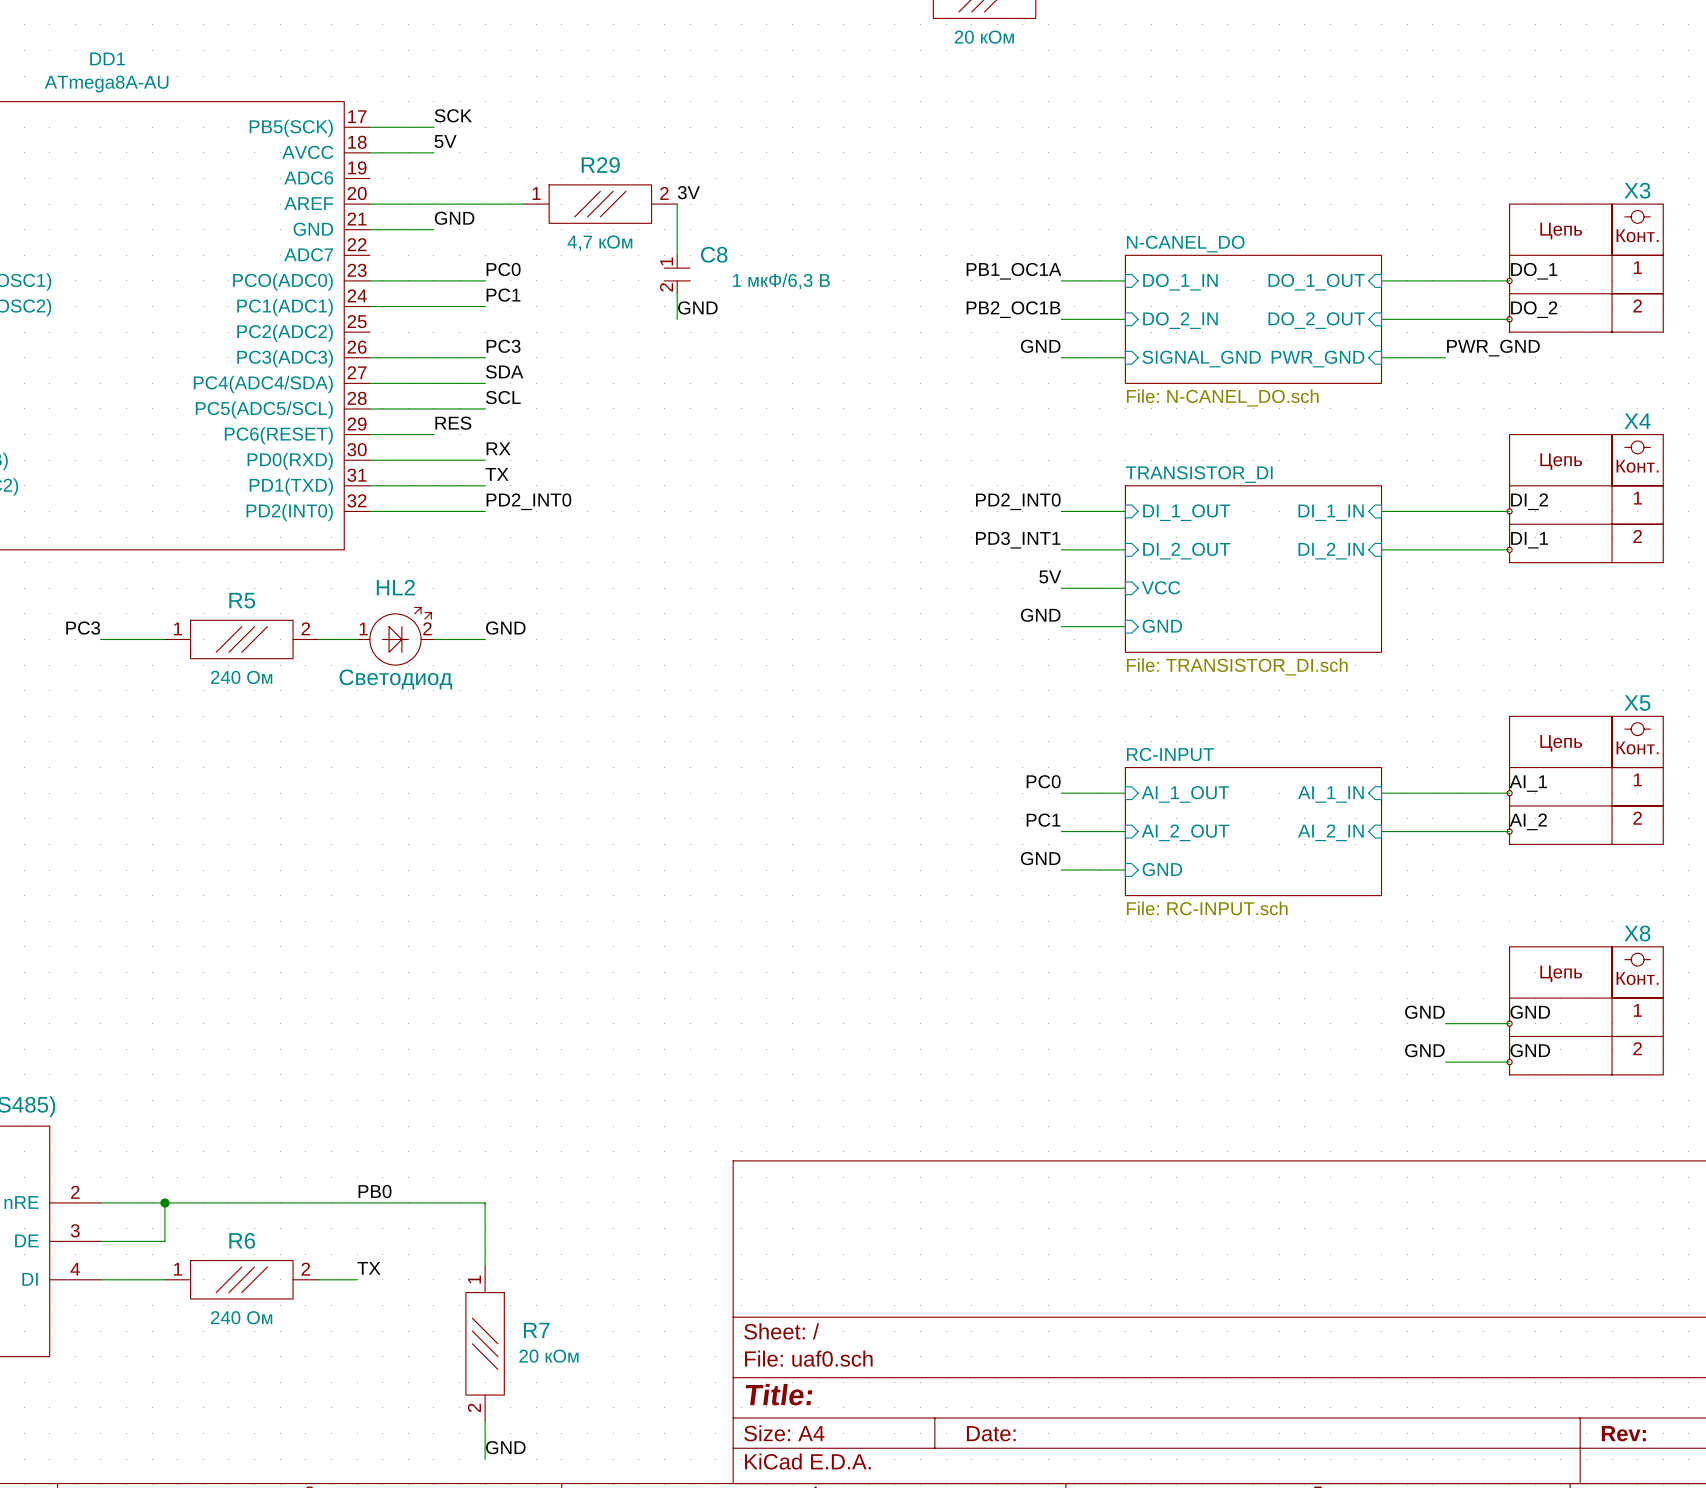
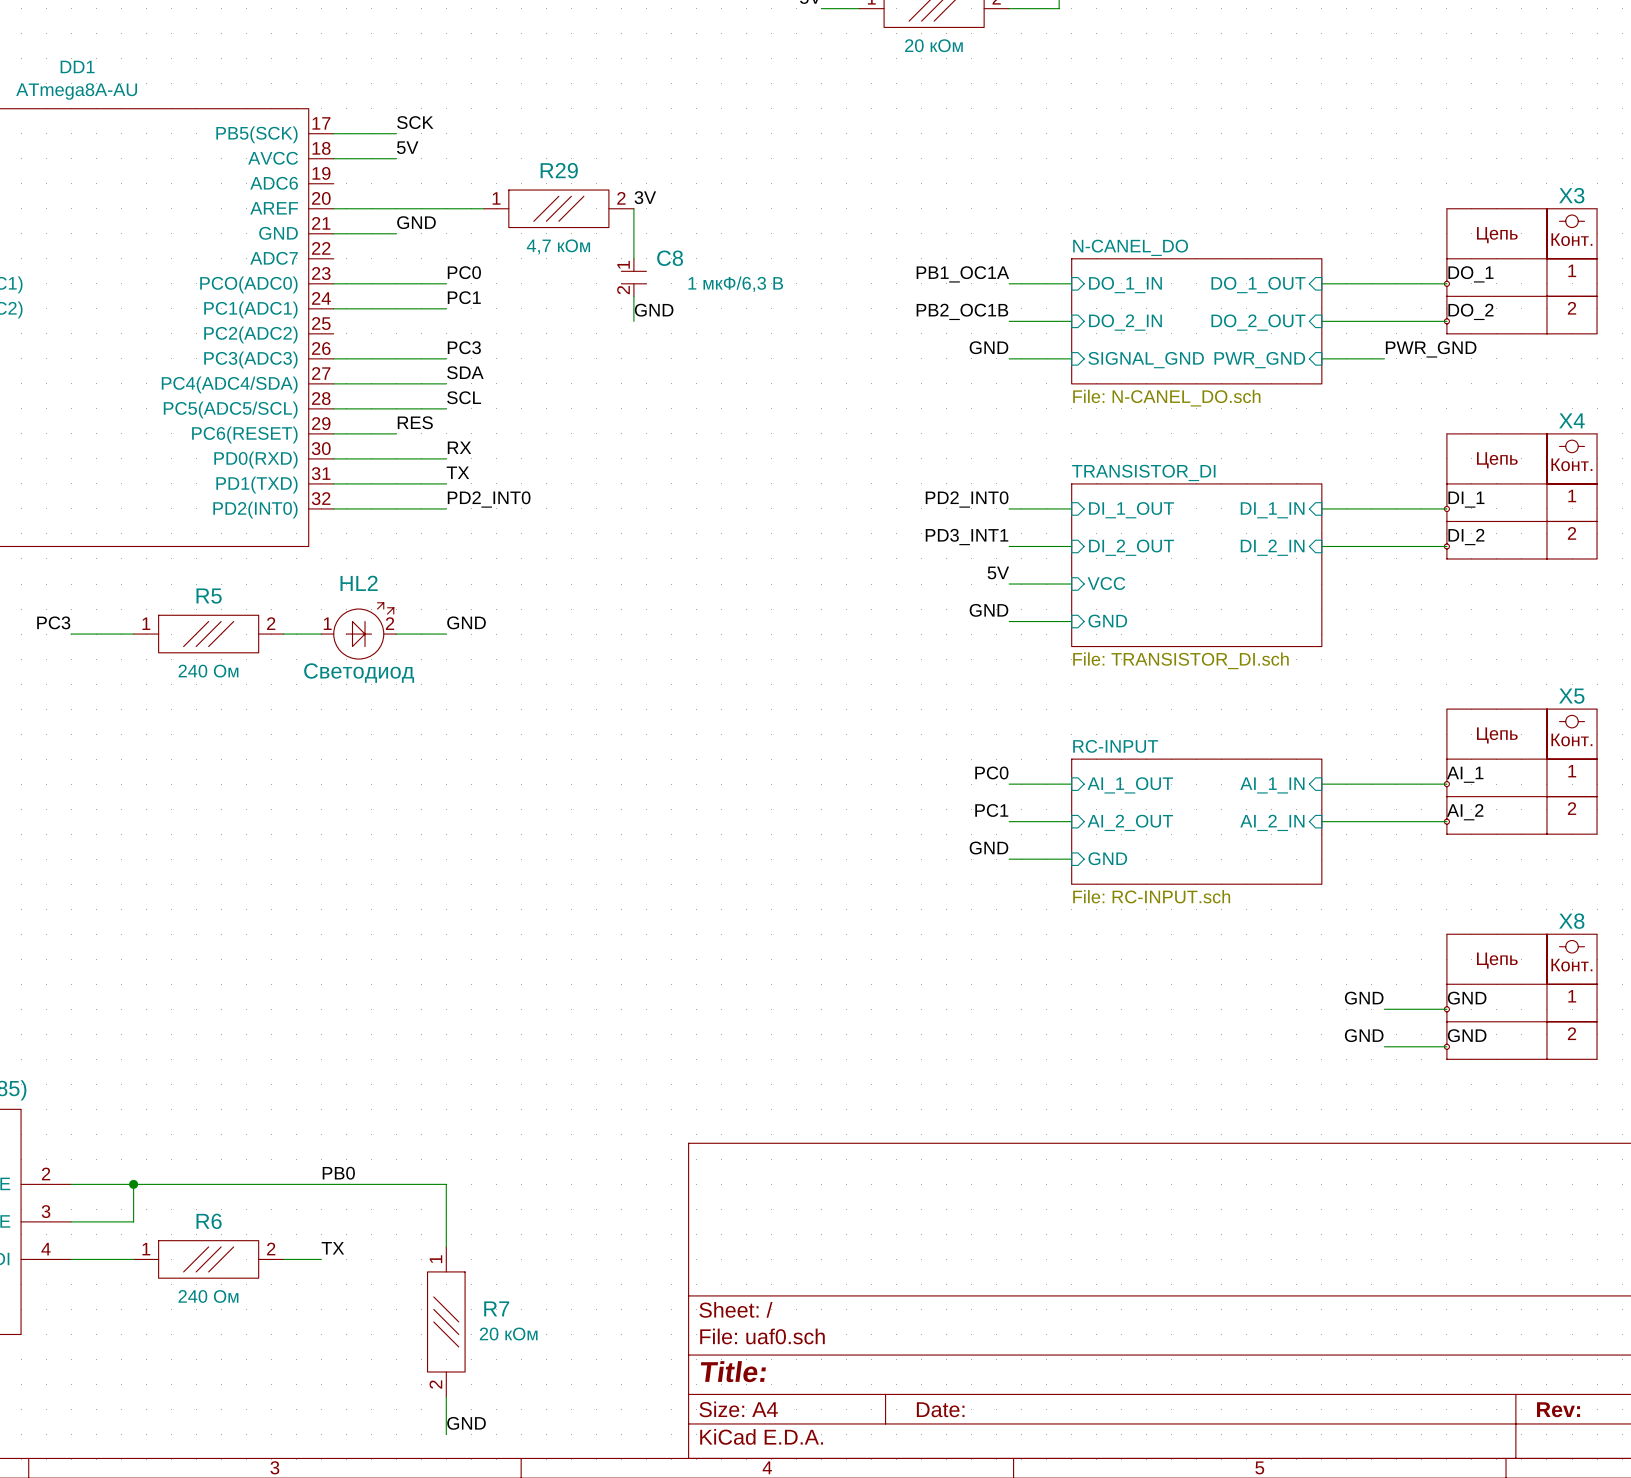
label: DI_2 (1529, 501) -> DI_1 (1466, 499)
label: DI_1 (1529, 540) -> DI_2 (1466, 537)

